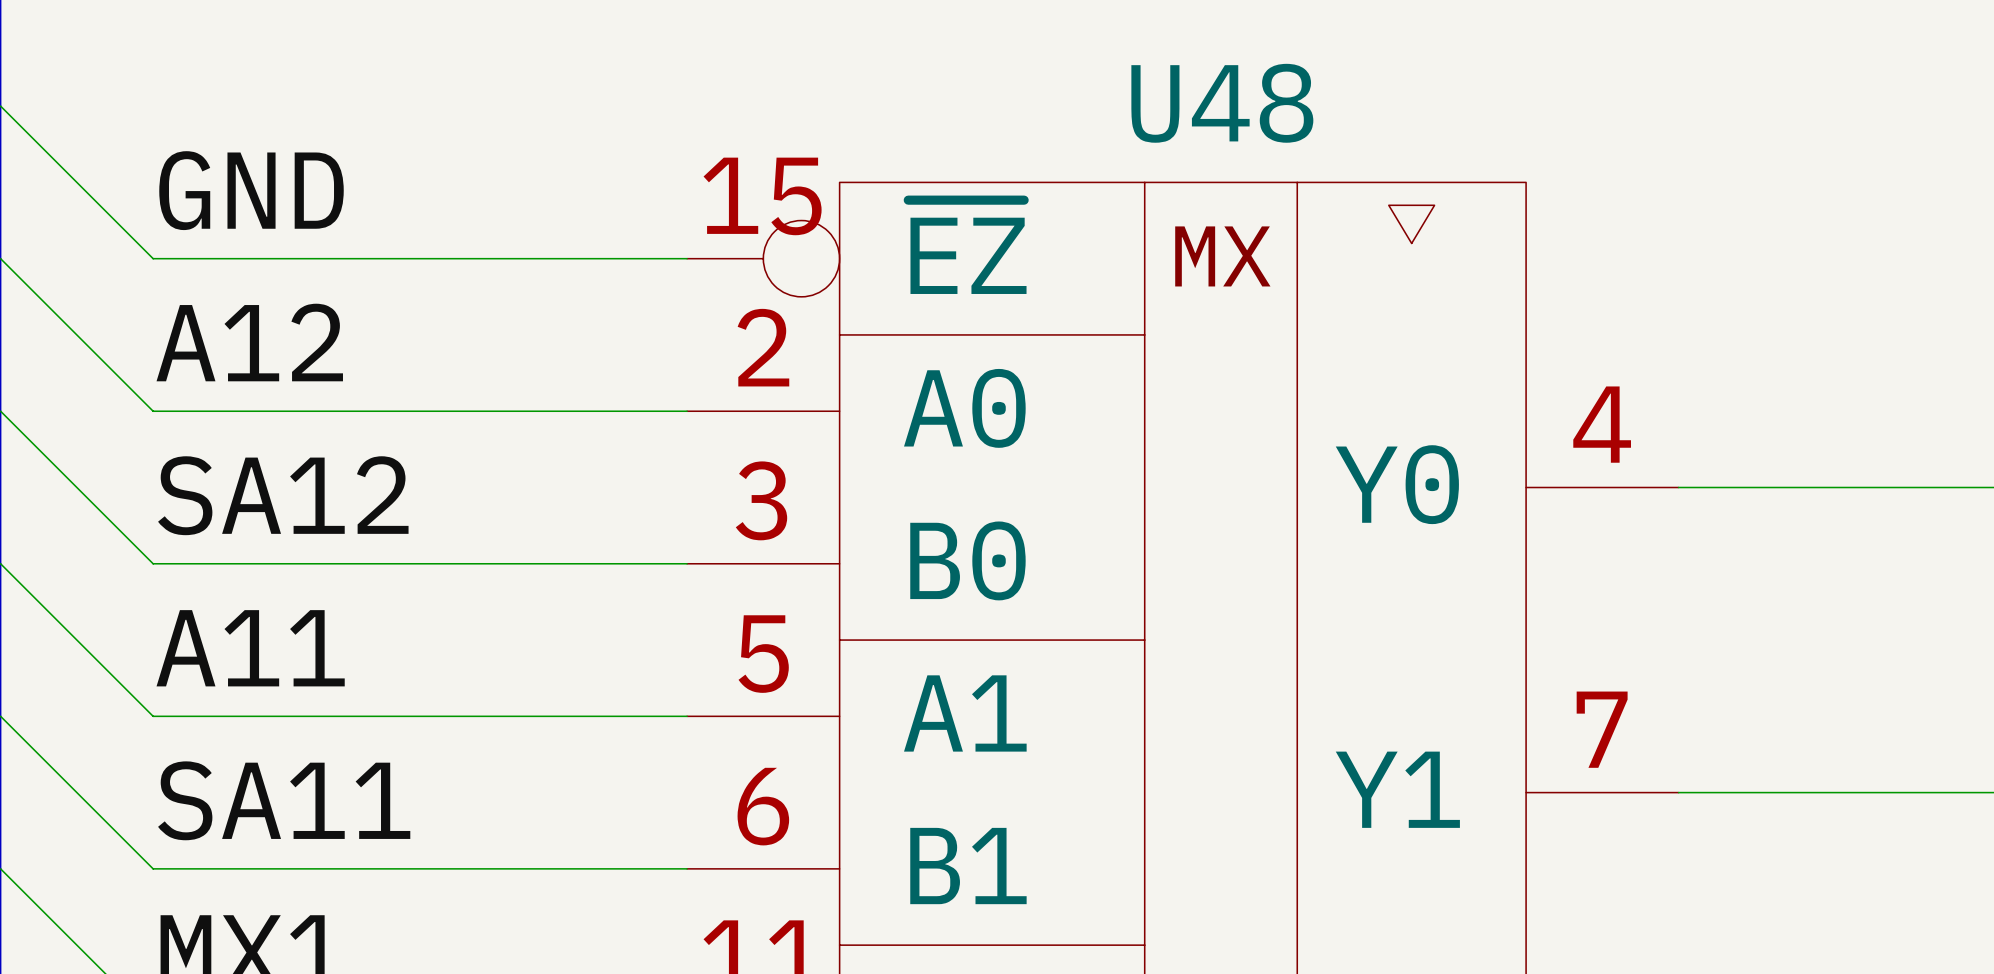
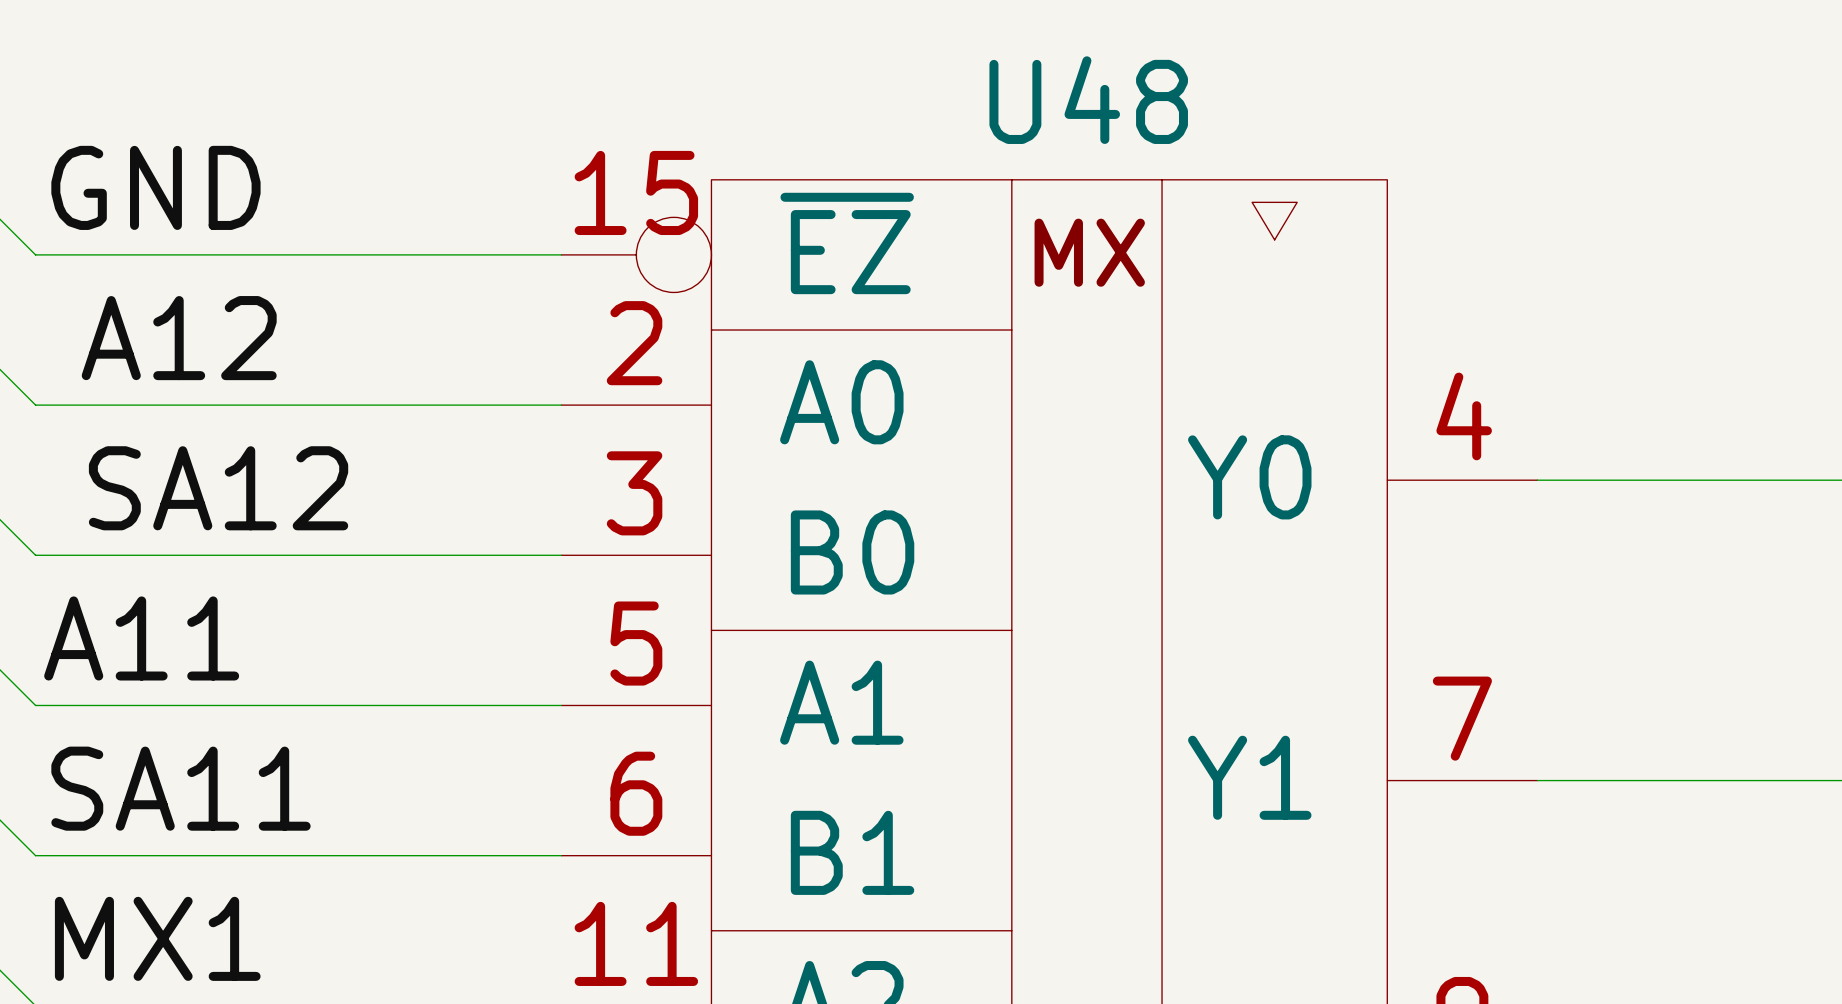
label position: A12 (249, 342) -> A12 (179, 338)
label position: SA12 (283, 495) -> SA12 (218, 488)

